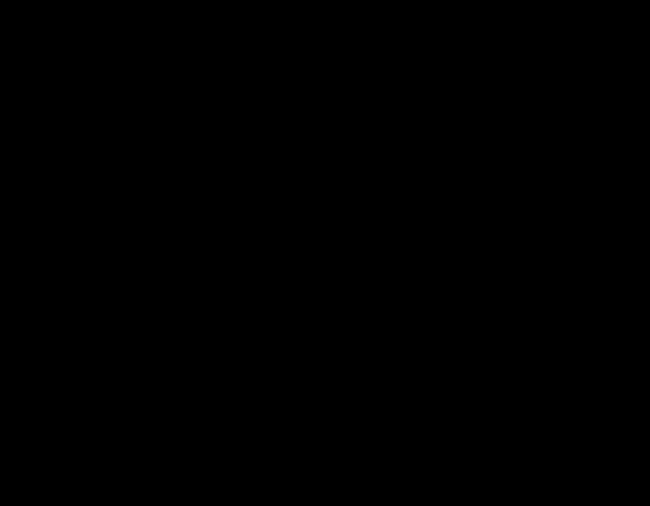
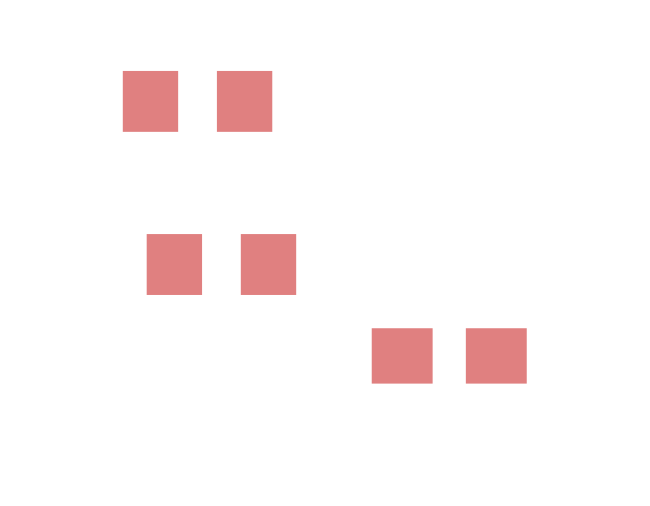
part: none -> (197, 101)
part: none -> (221, 264)
part: none -> (449, 355)

